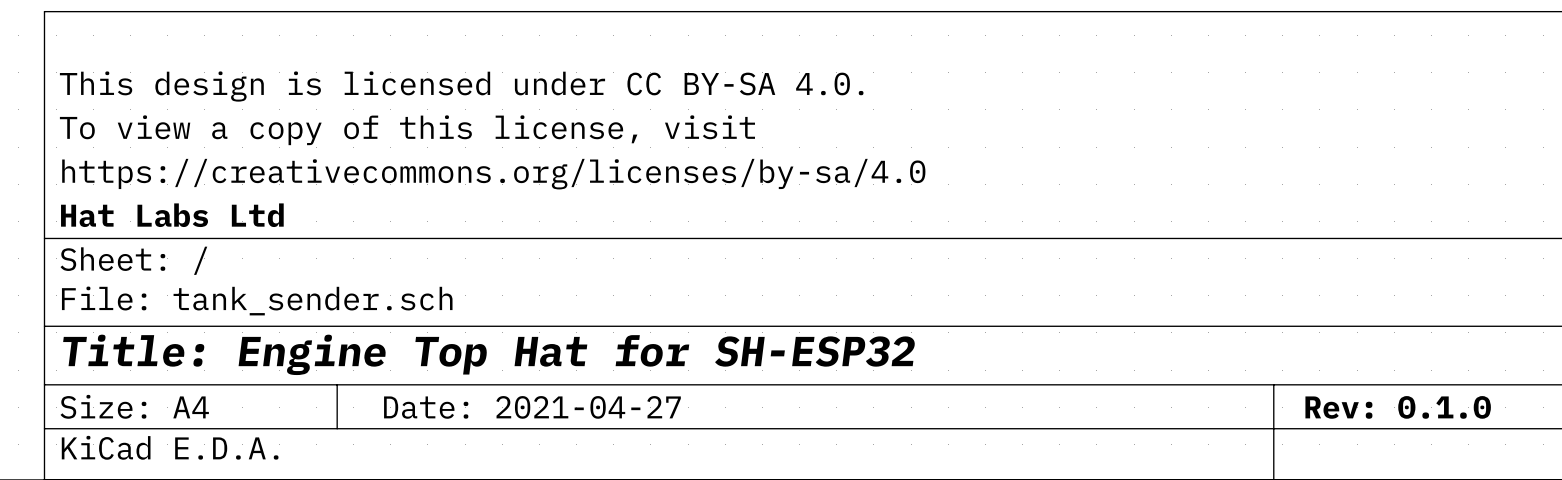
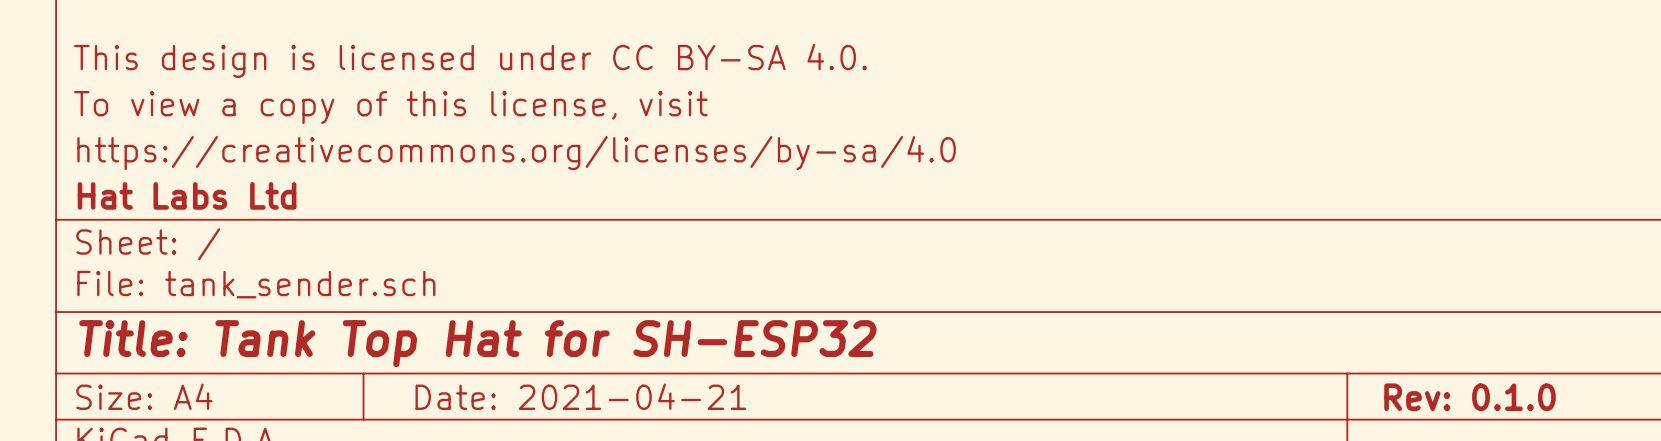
title block: Title: Engine Top Hat for SH-ESP32 (489, 354) -> Title: Tank Top Hat for SH-ESP32 (477, 343)
title block: Date: 2021-04-27 (532, 407) -> Date: 2021-04-21 (580, 396)

